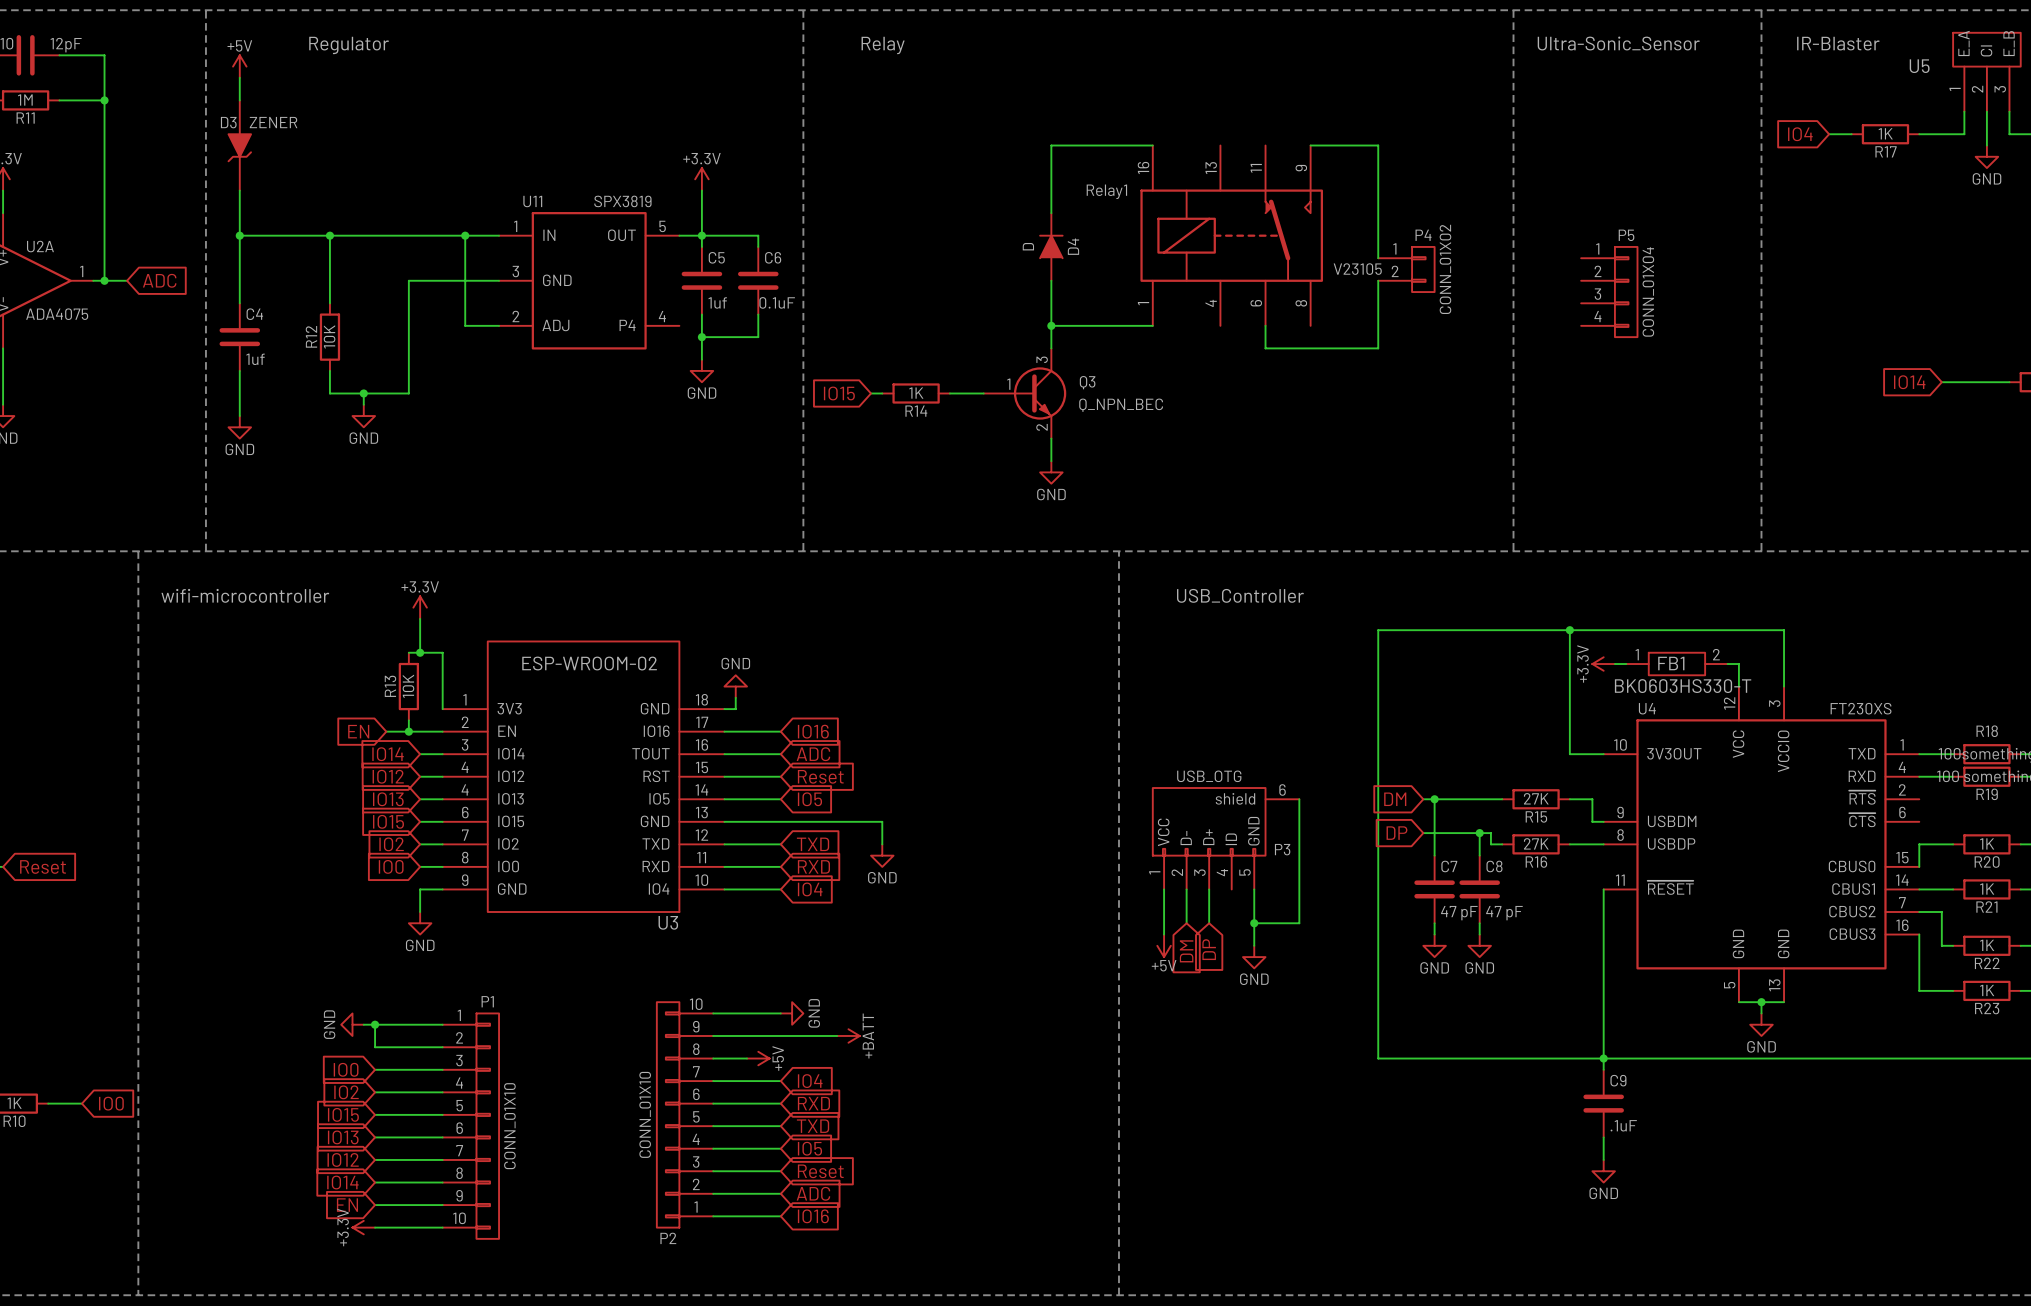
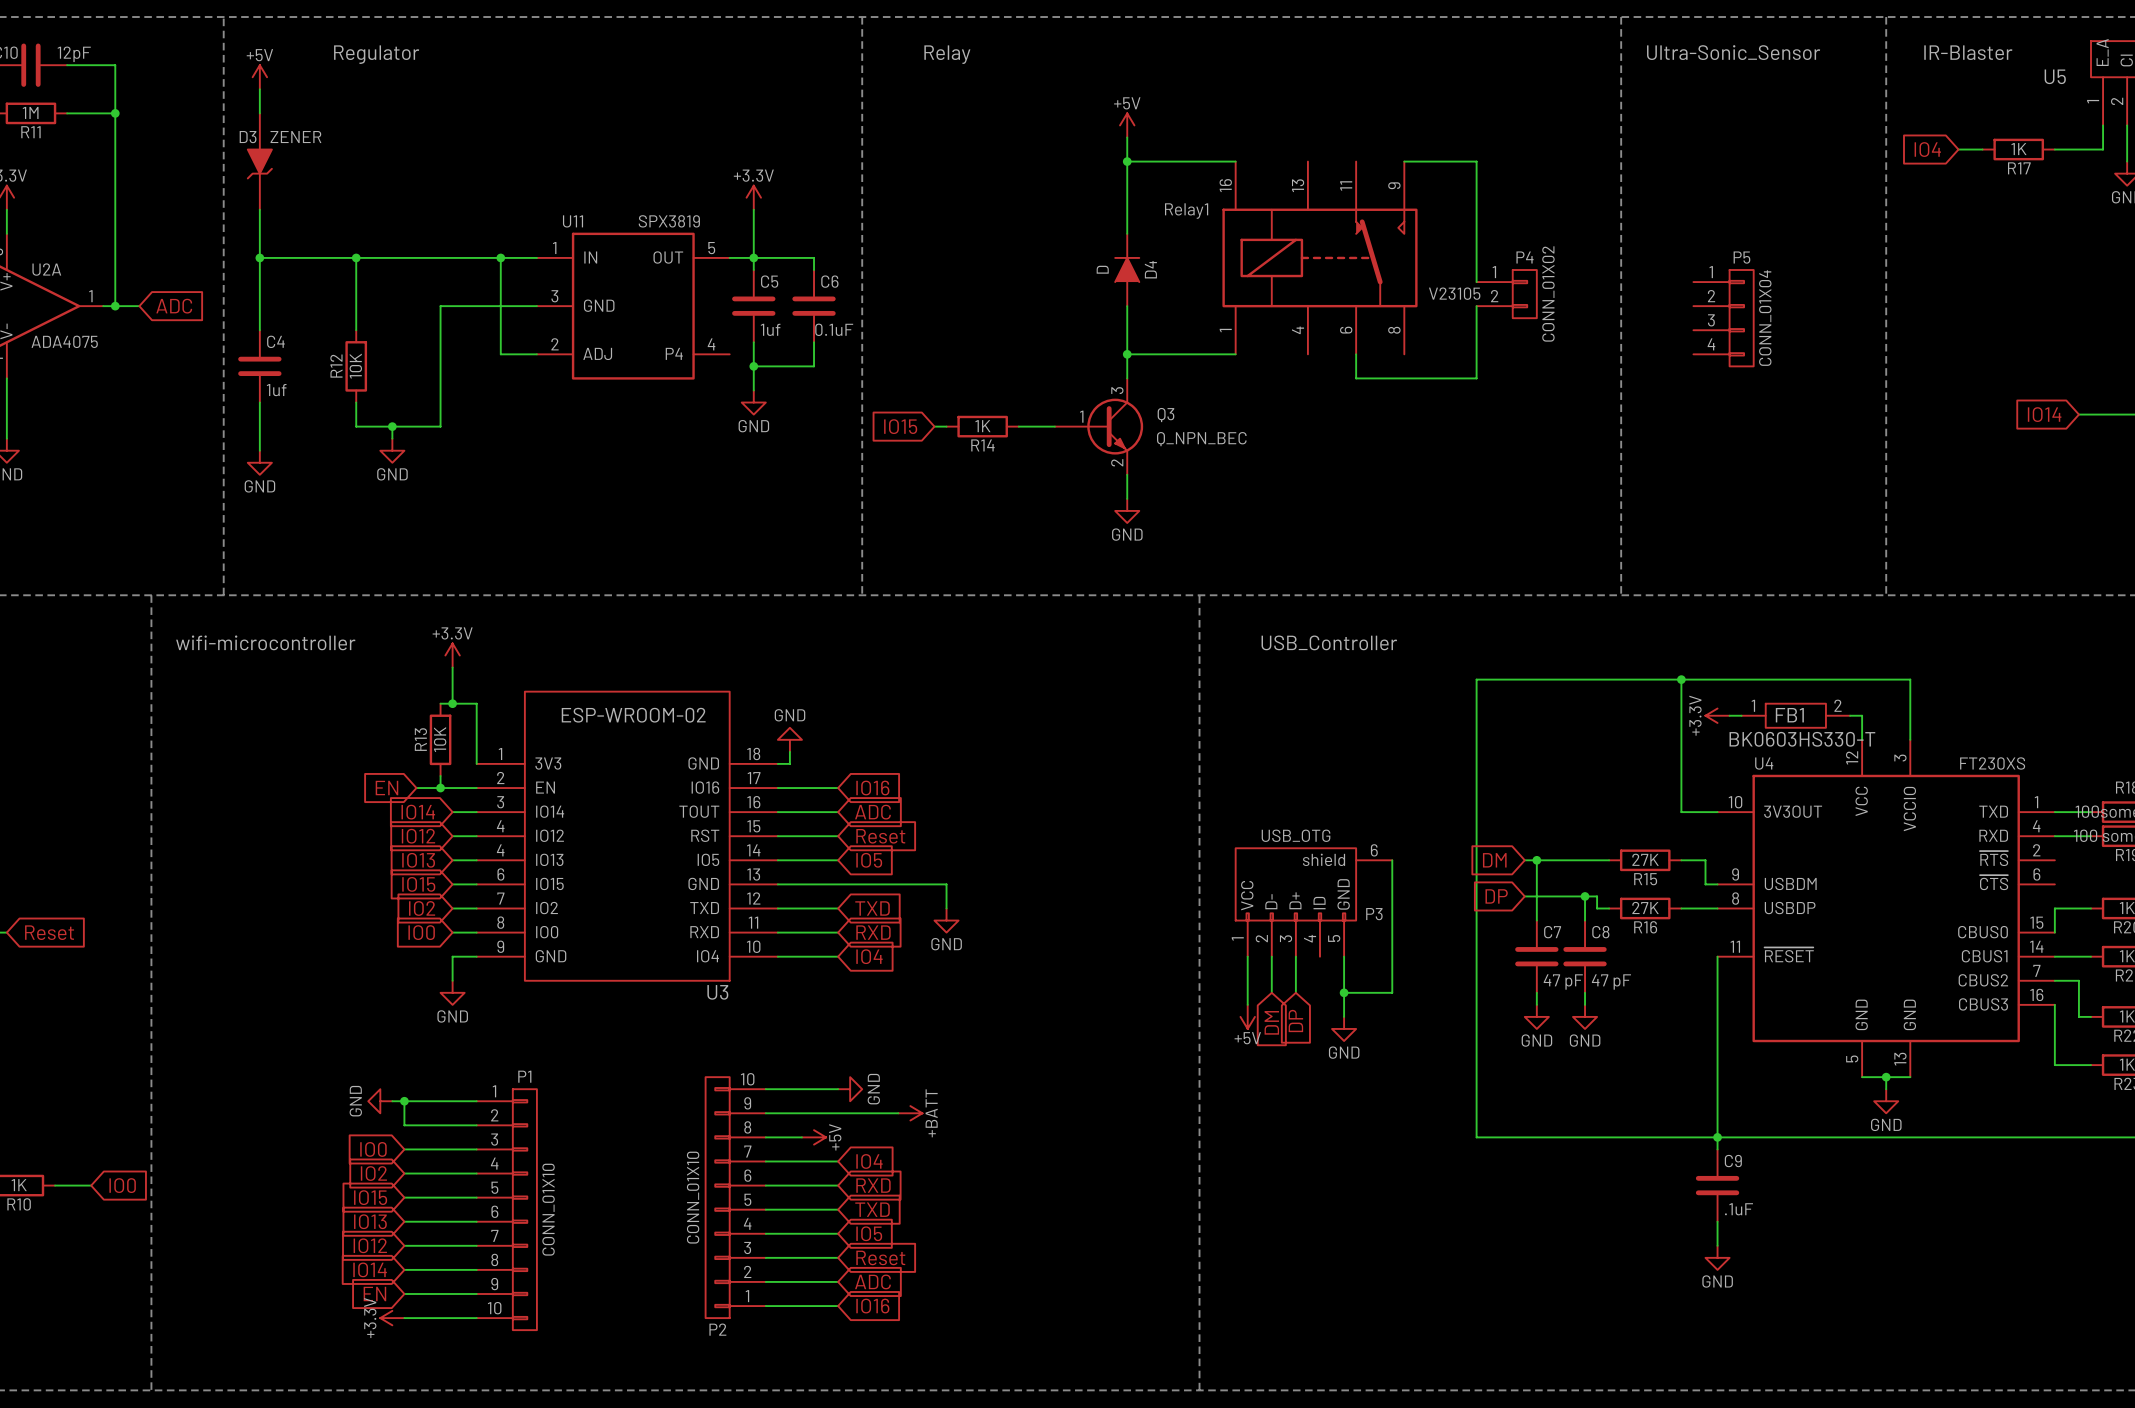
power symbol: none -> +5V (1127, 125)
wire: none -> (1127, 137) (1127, 161)
junction: none -> (1127, 161)

